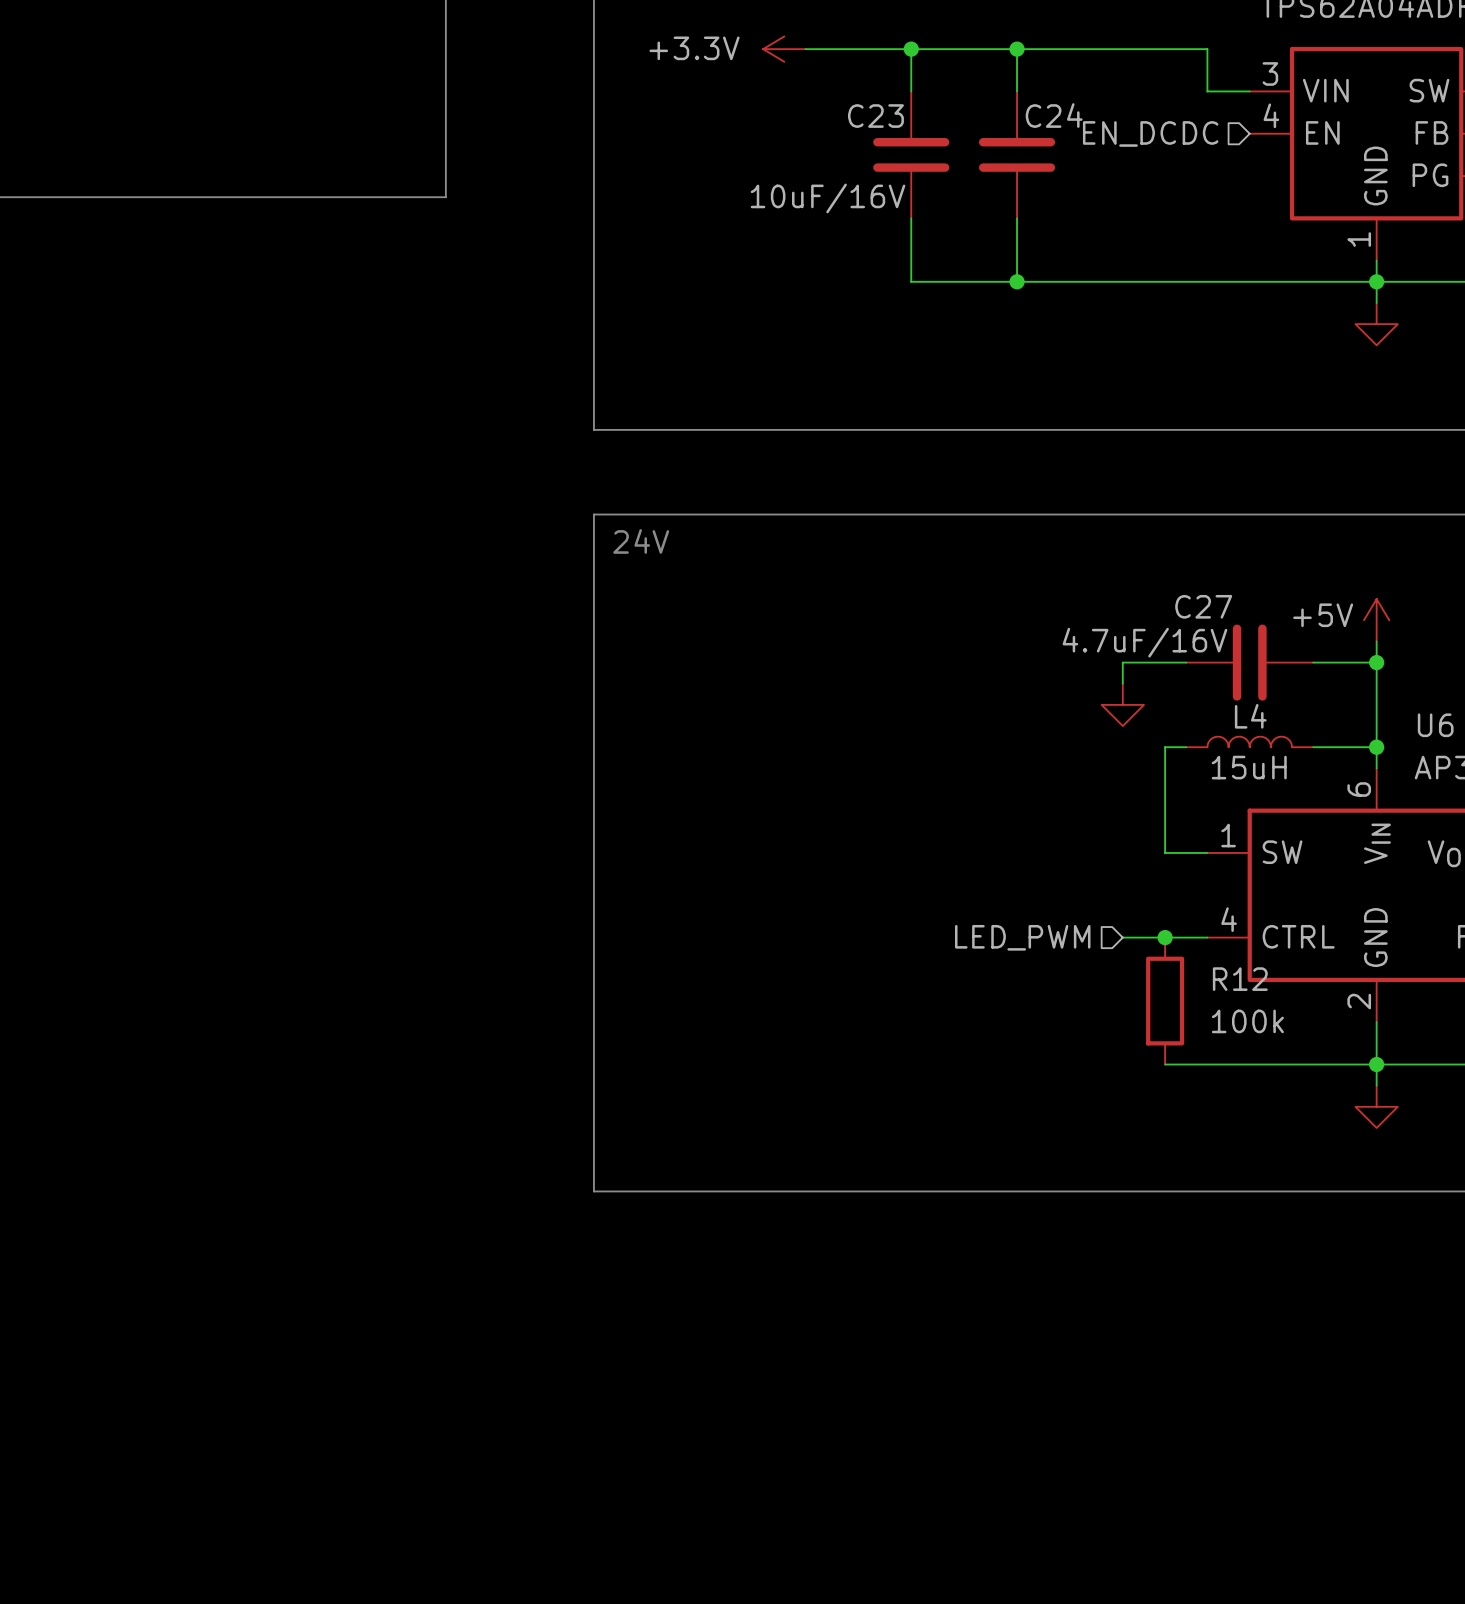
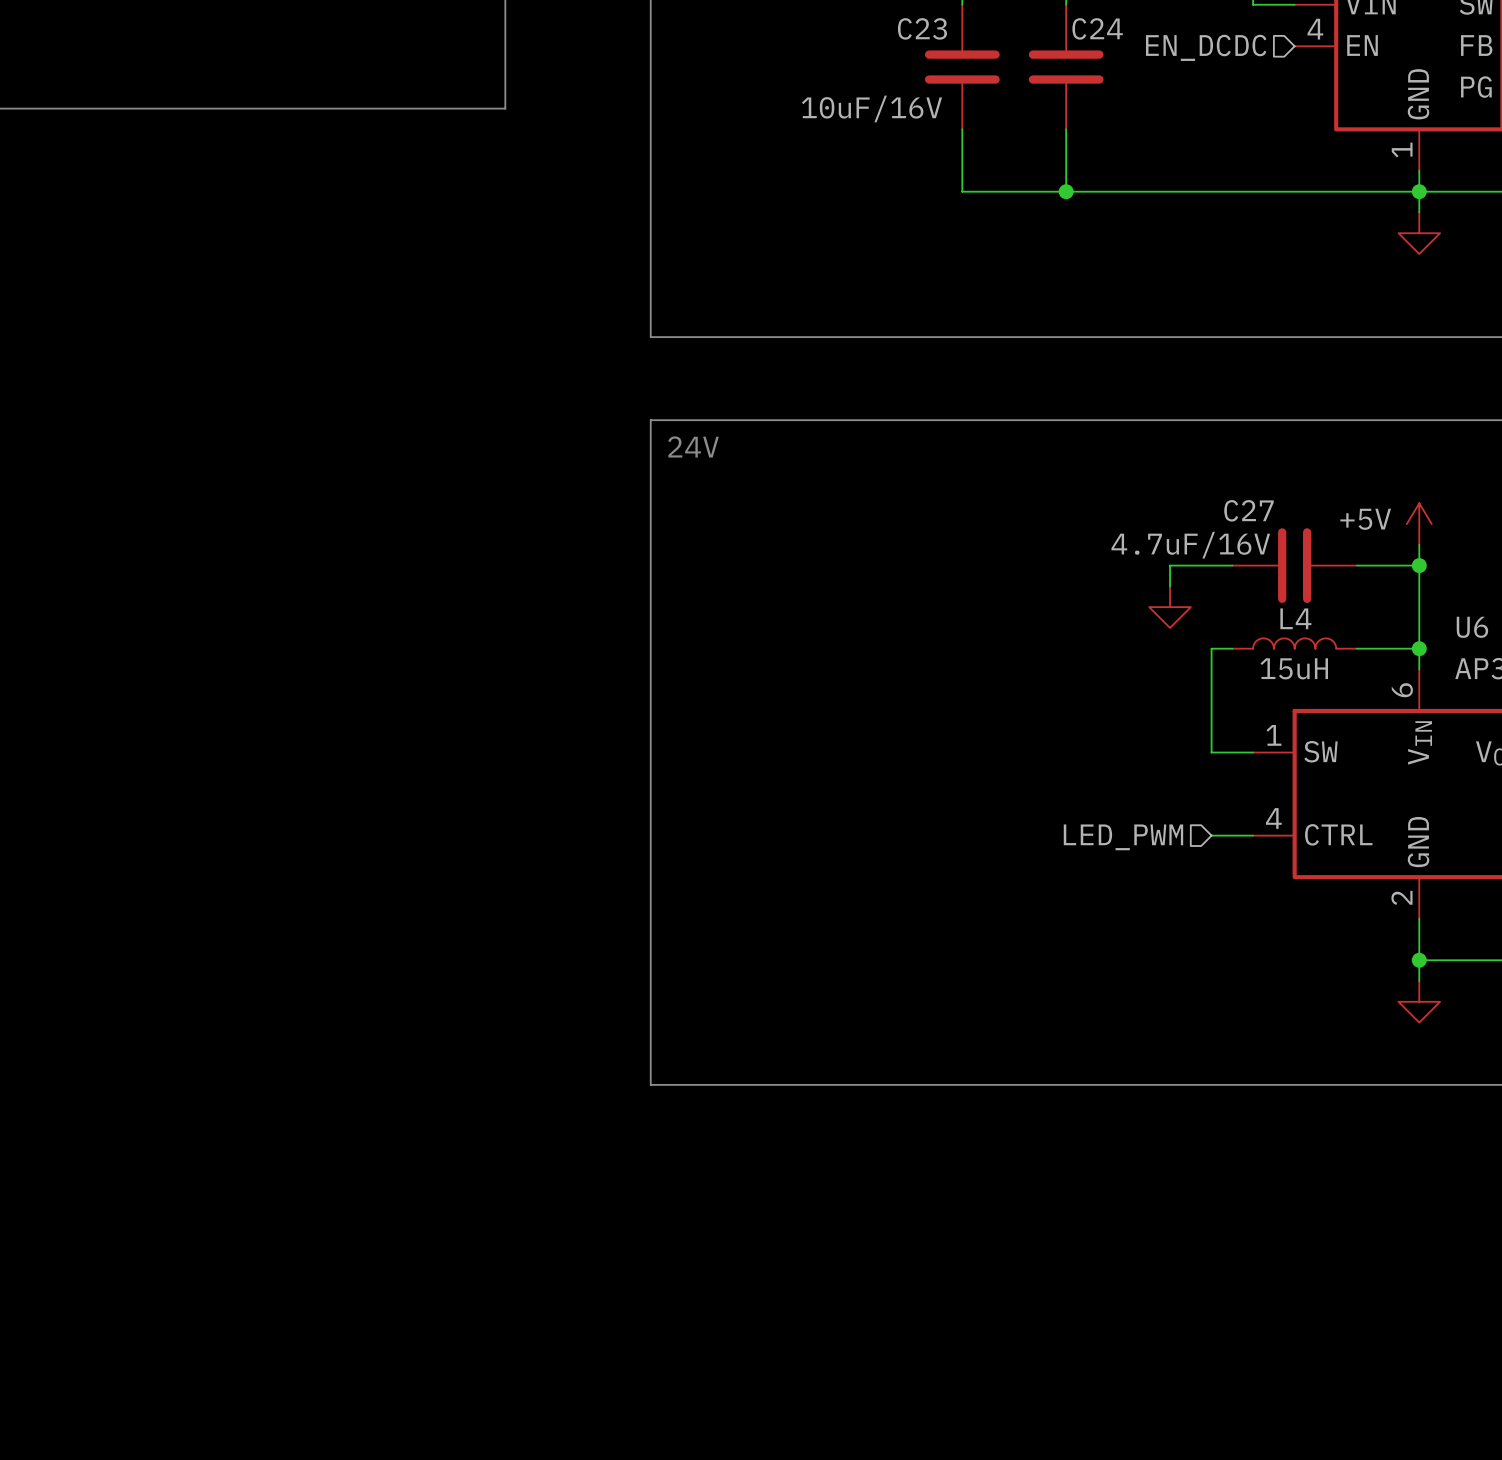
hierarchical label position: LED_PWM (1022, 937) -> LED_PWM (1123, 837)
wire: (1122, 937) (1165, 937) -> none
junction: (1165, 937) -> none
R12: 100k (1165, 1001) -> none
wire: (1165, 1064) (1376, 1064) -> none

